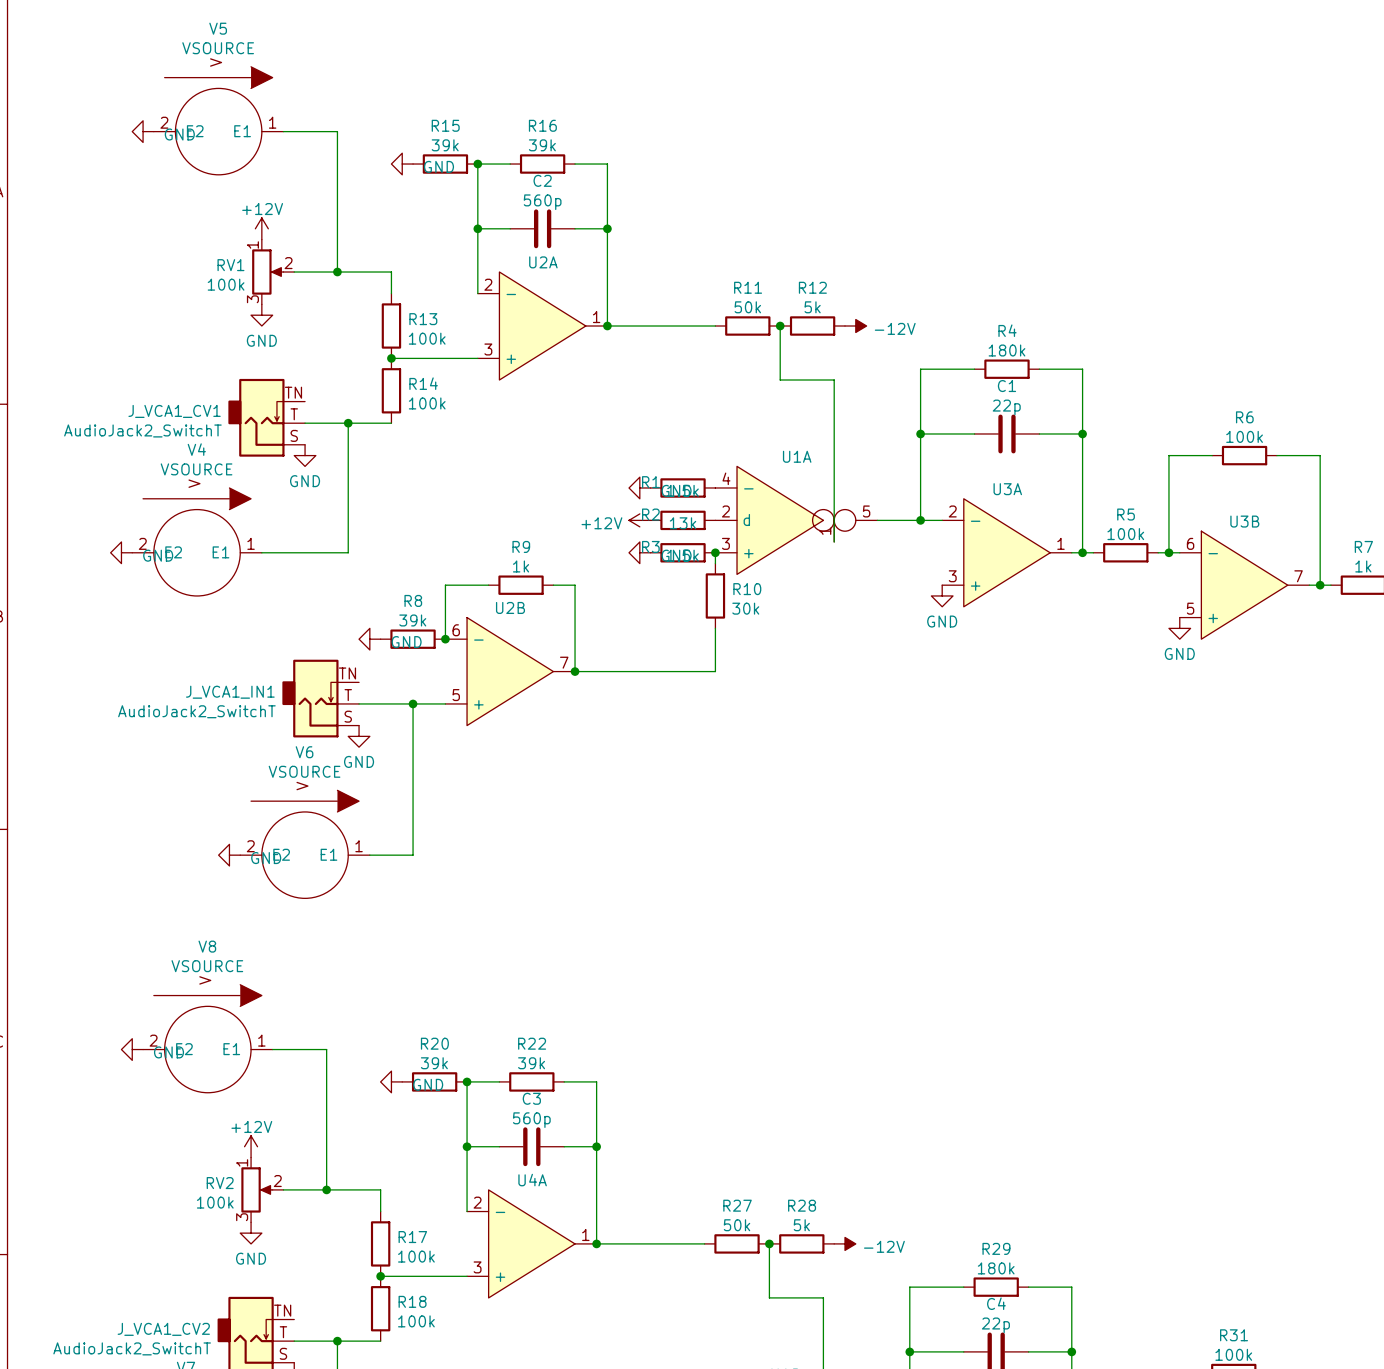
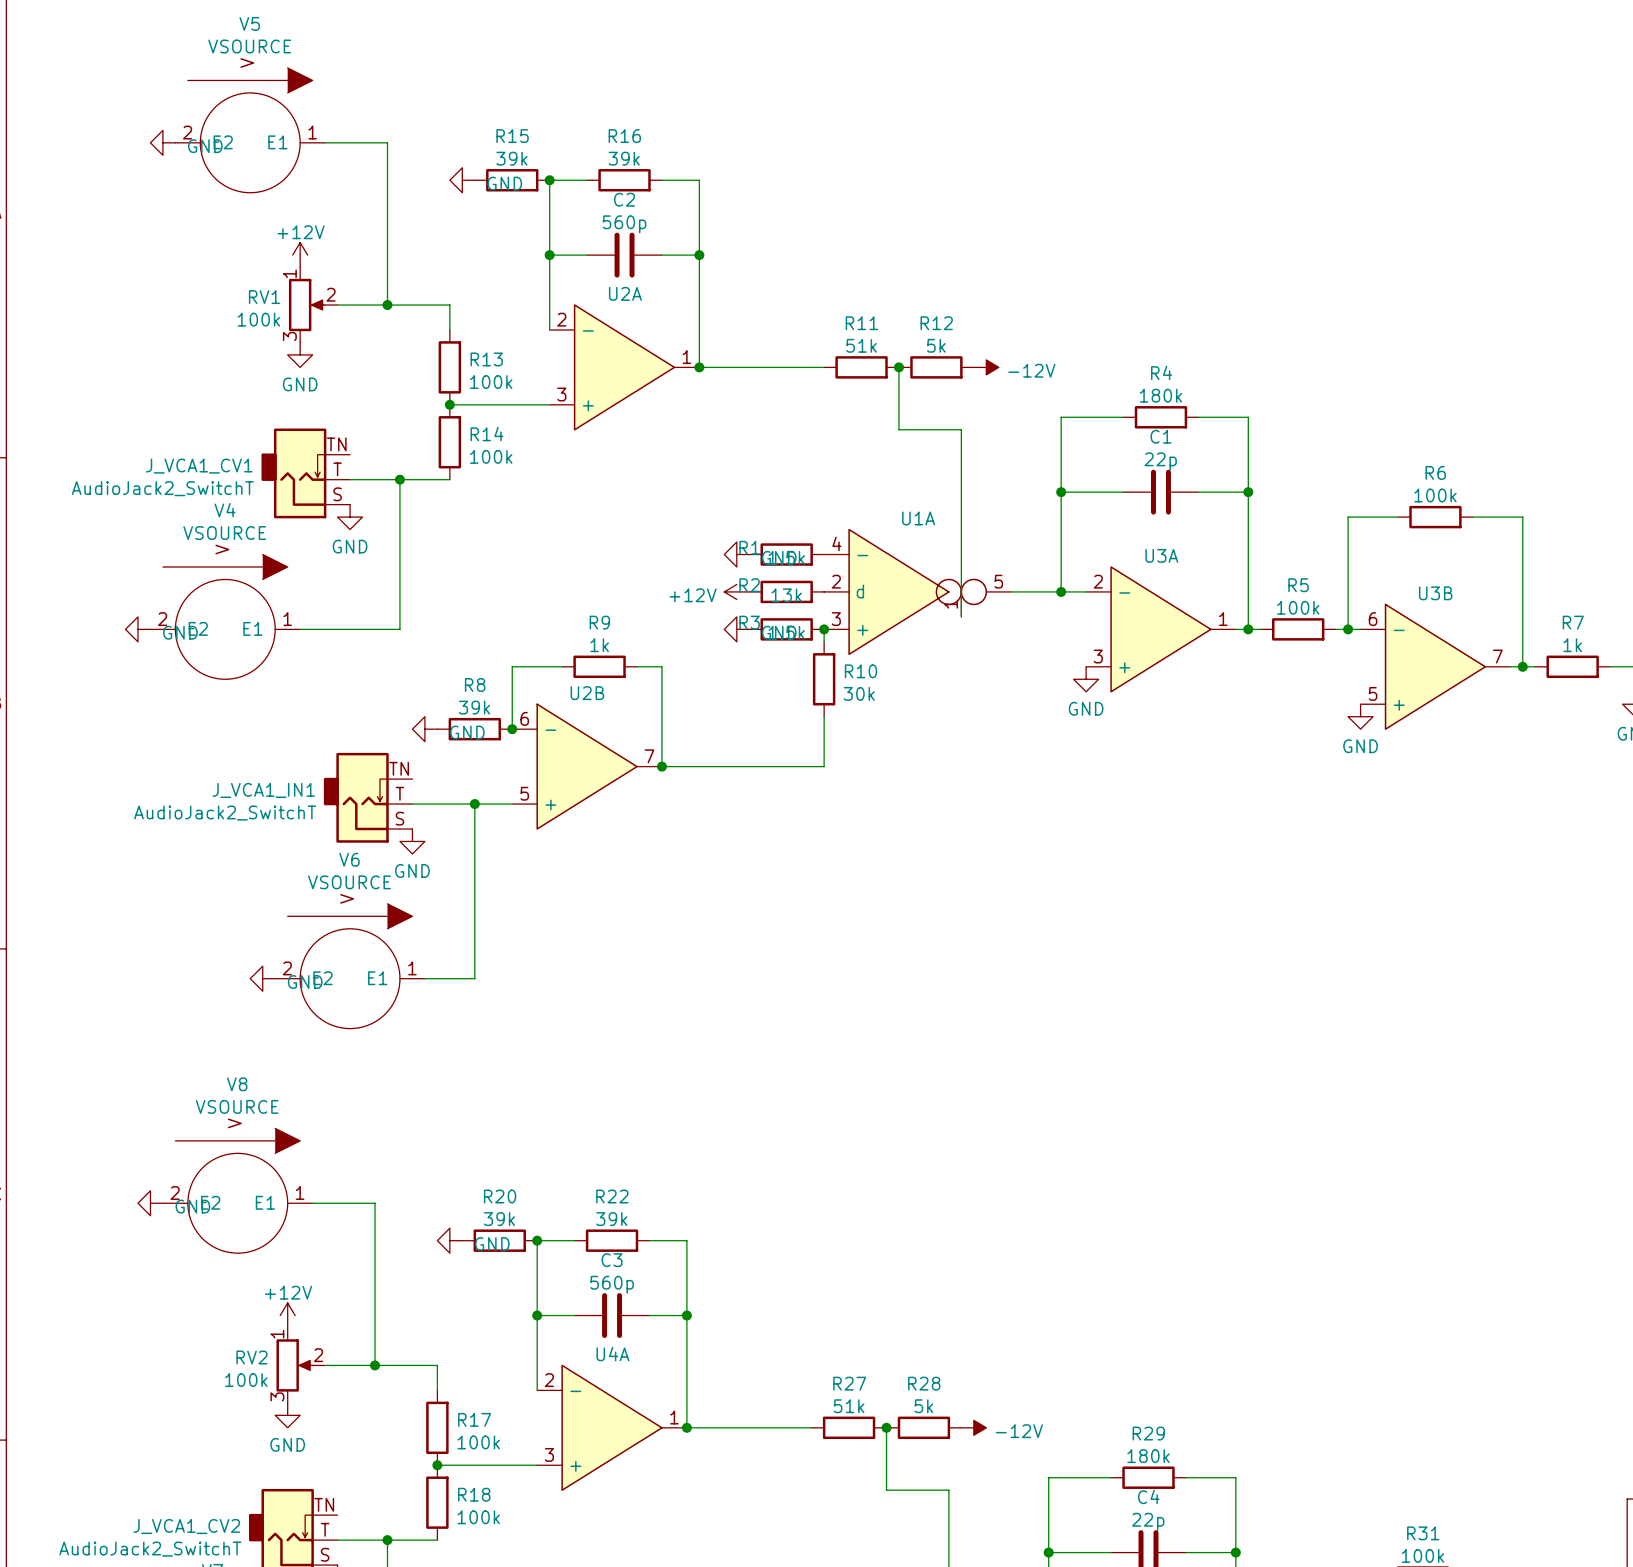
R11 value: 50k (747, 307) -> 51k (861, 345)
R27 value: 50k (737, 1225) -> 51k (849, 1406)

